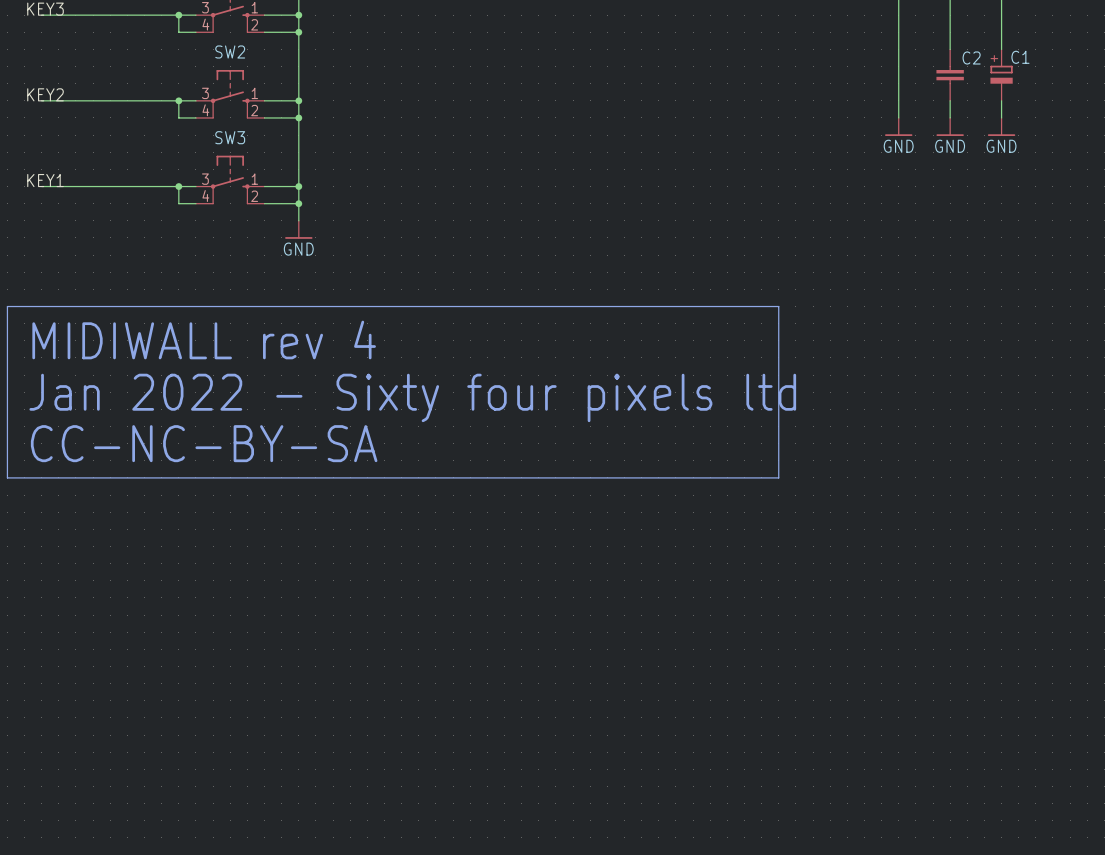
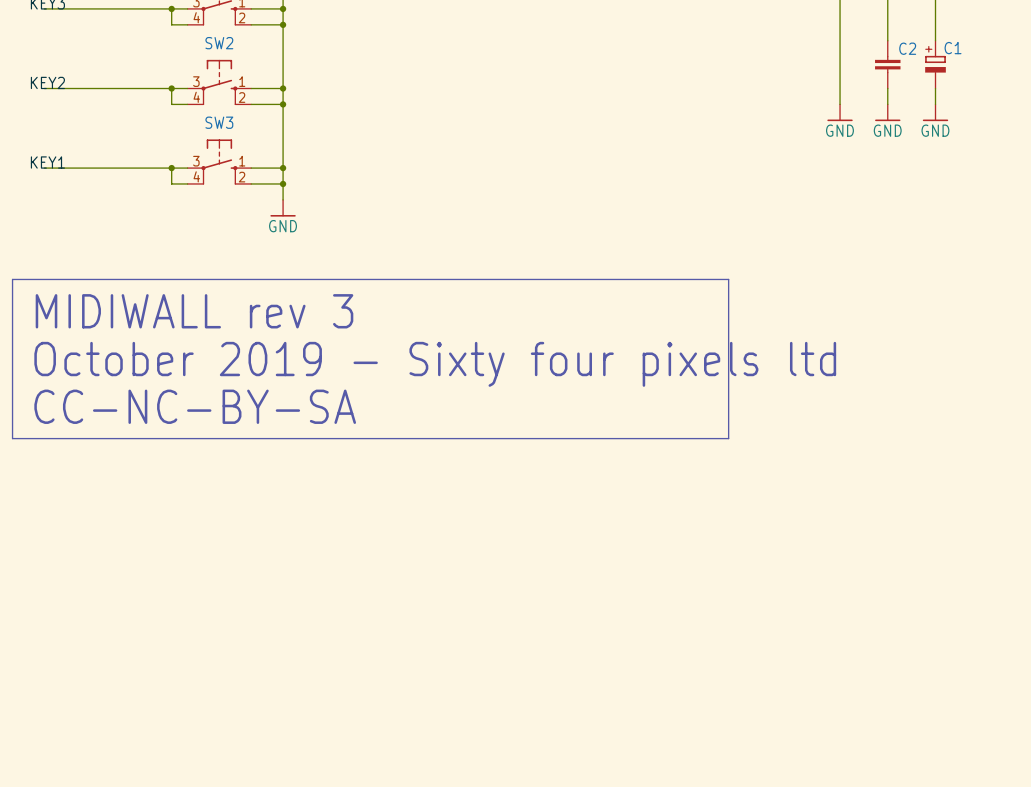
text: MIDIWALL rev 4 (204, 339) -> MIDIWALL rev 3 (194, 311)
text: Jan 2022 - Sixty four pixels ltd (412, 397) -> October 2019 - Sixty four pixels ltd (435, 364)

